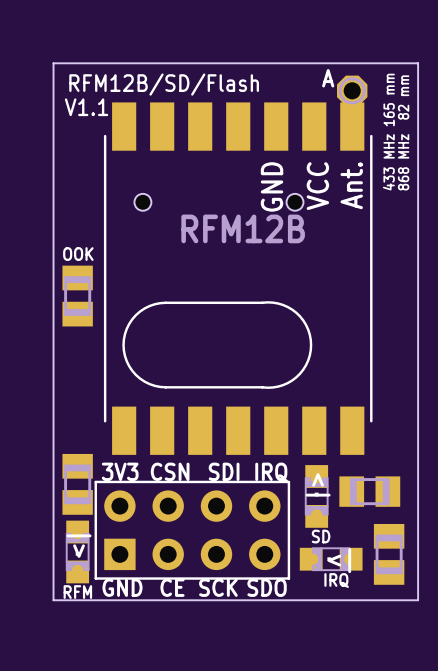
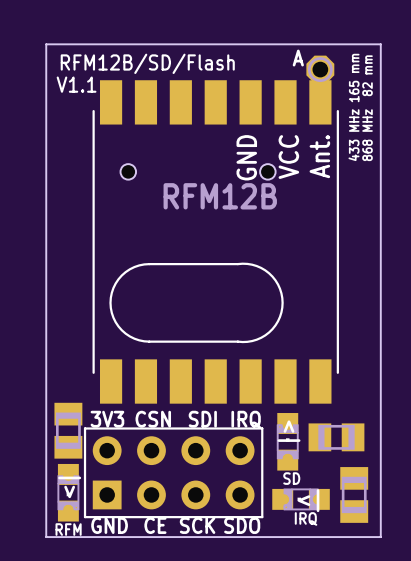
text: OOK (78, 254) -> none
part: (77, 296) -> none

